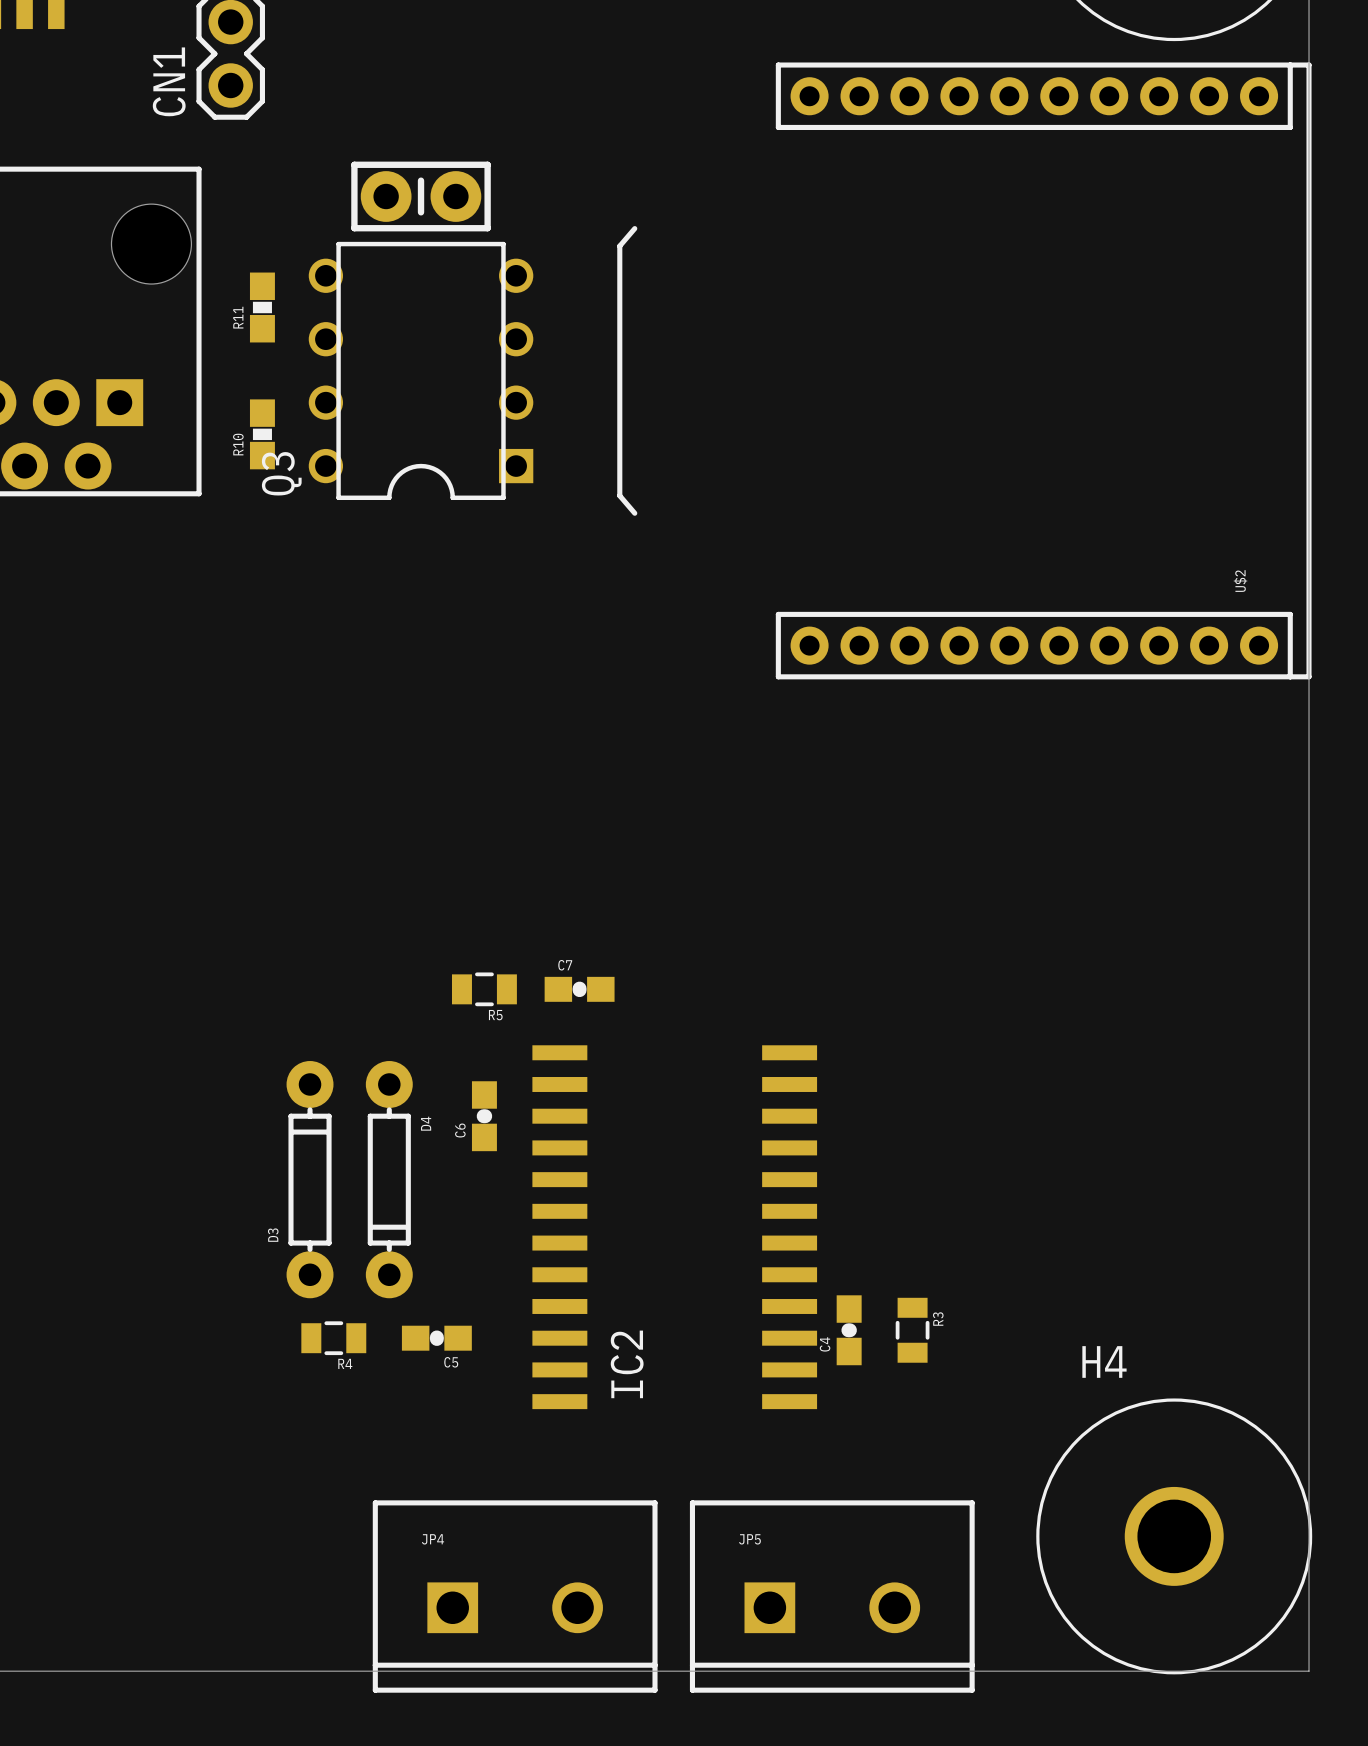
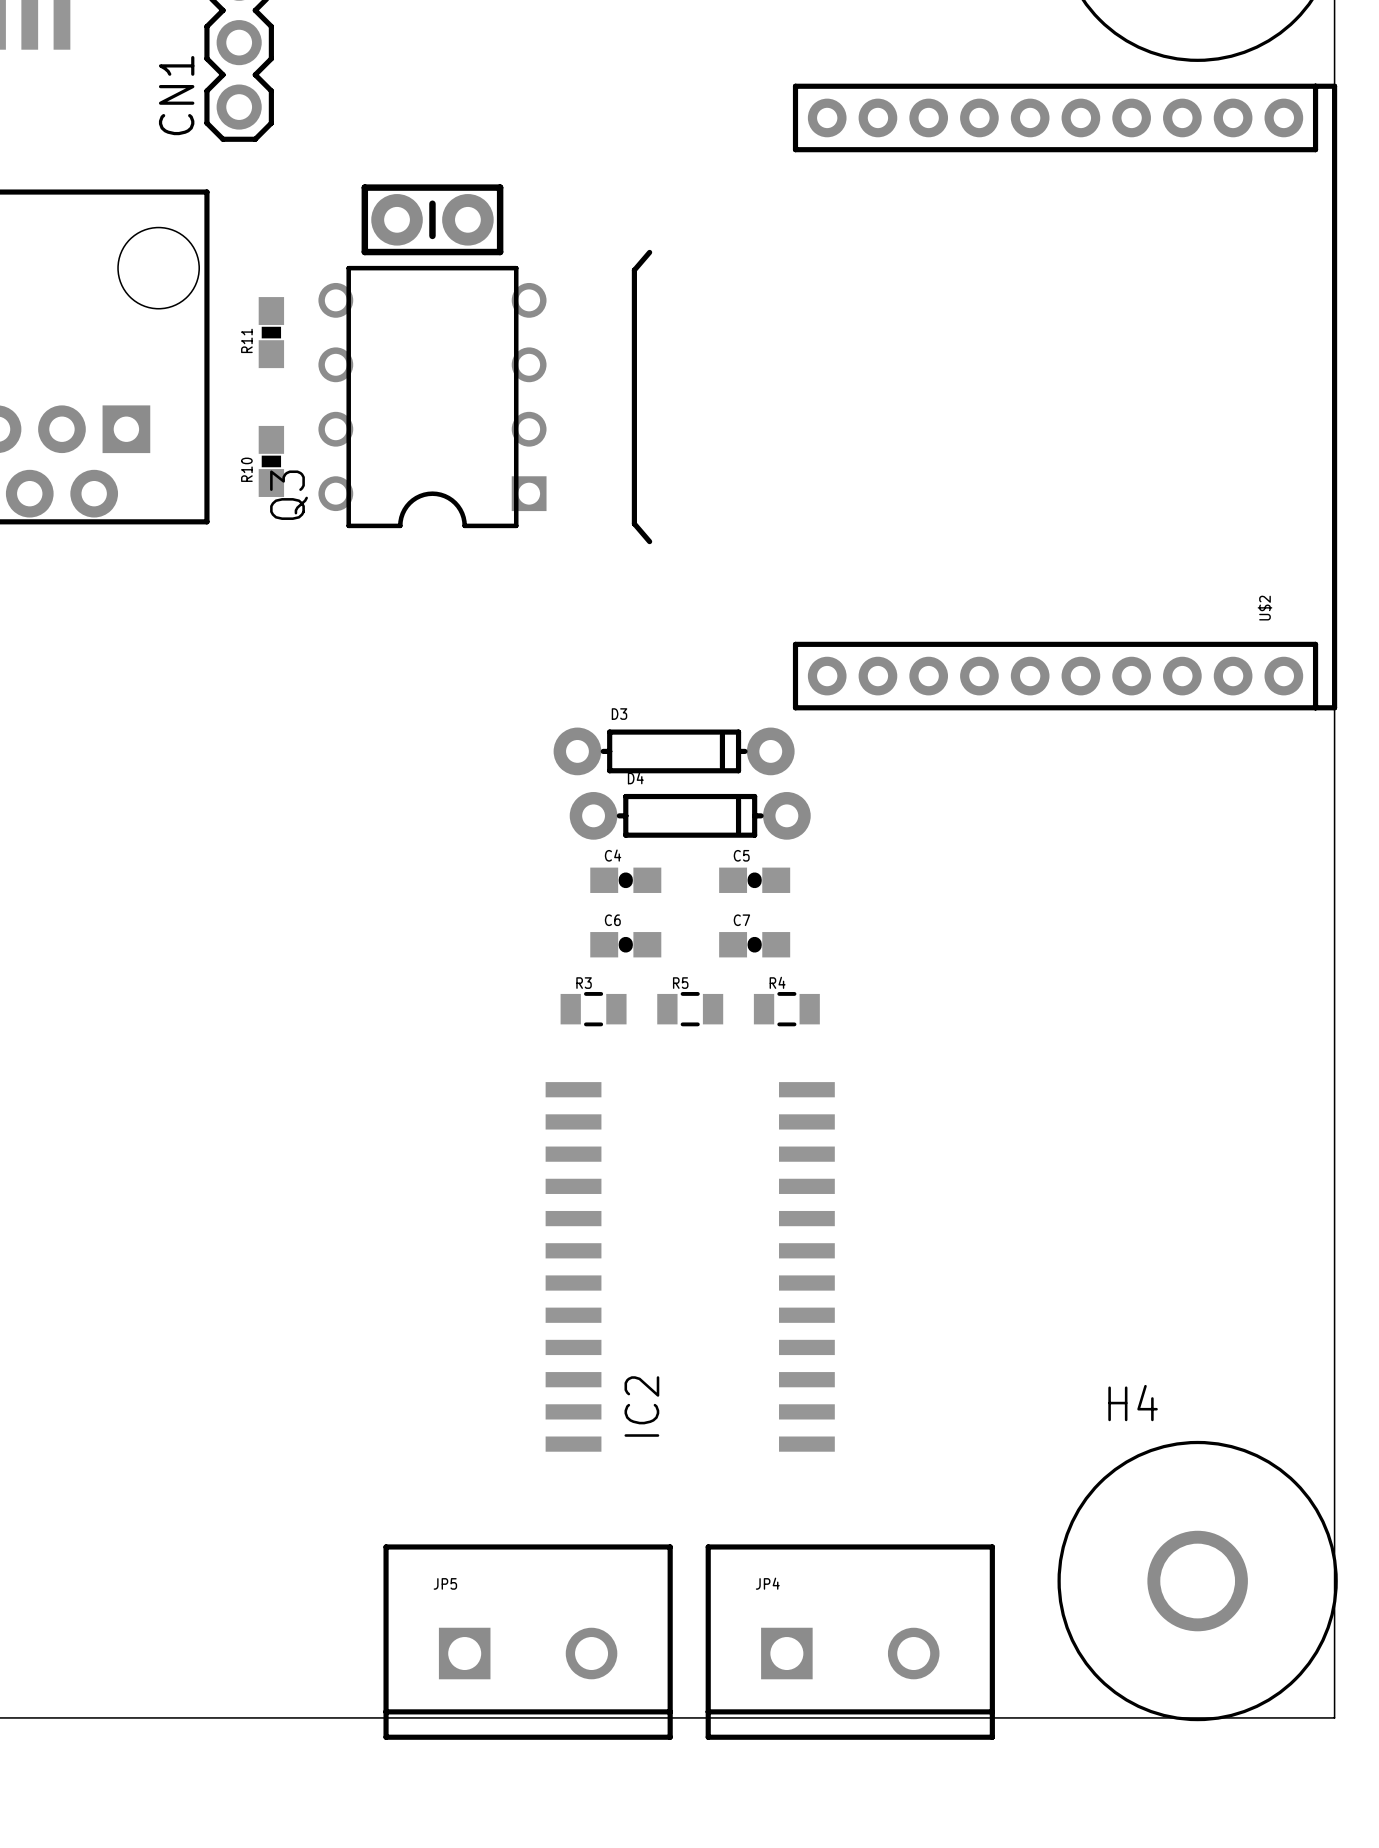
R5 position: (484, 989) -> (690, 1009)
C7 position: (579, 989) -> (754, 944)
R5 name position: R5 (495, 1015) -> R5 (680, 983)
C6 rotation: 0° (484, 1116) -> 90° clockwise (625, 944)
C6 position: (484, 1116) -> (625, 944)
D3 rotation: 0° (310, 1179) -> 90° clockwise (674, 751)
D3 position: (310, 1179) -> (674, 751)
D4 rotation: 0° (389, 1179) -> 90° counterclockwise (690, 815)
D4 position: (389, 1179) -> (690, 815)
C4 rotation: 0° (849, 1330) -> 90° clockwise (625, 880)
C4 position: (849, 1330) -> (625, 880)
R3 rotation: 0° (912, 1330) -> 90° clockwise (593, 1009)
R3 position: (912, 1330) -> (593, 1009)
R4 position: (333, 1338) -> (786, 1009)
C5 position: (436, 1338) -> (754, 880)
C5 name position: C5 (451, 1362) -> C5 (741, 855)
R4 name position: R4 (345, 1363) -> R4 (777, 982)
JP4 name: JP4 (433, 1539) -> JP5 (445, 1583)
JP5 name: JP5 (749, 1539) -> JP4 (767, 1583)

